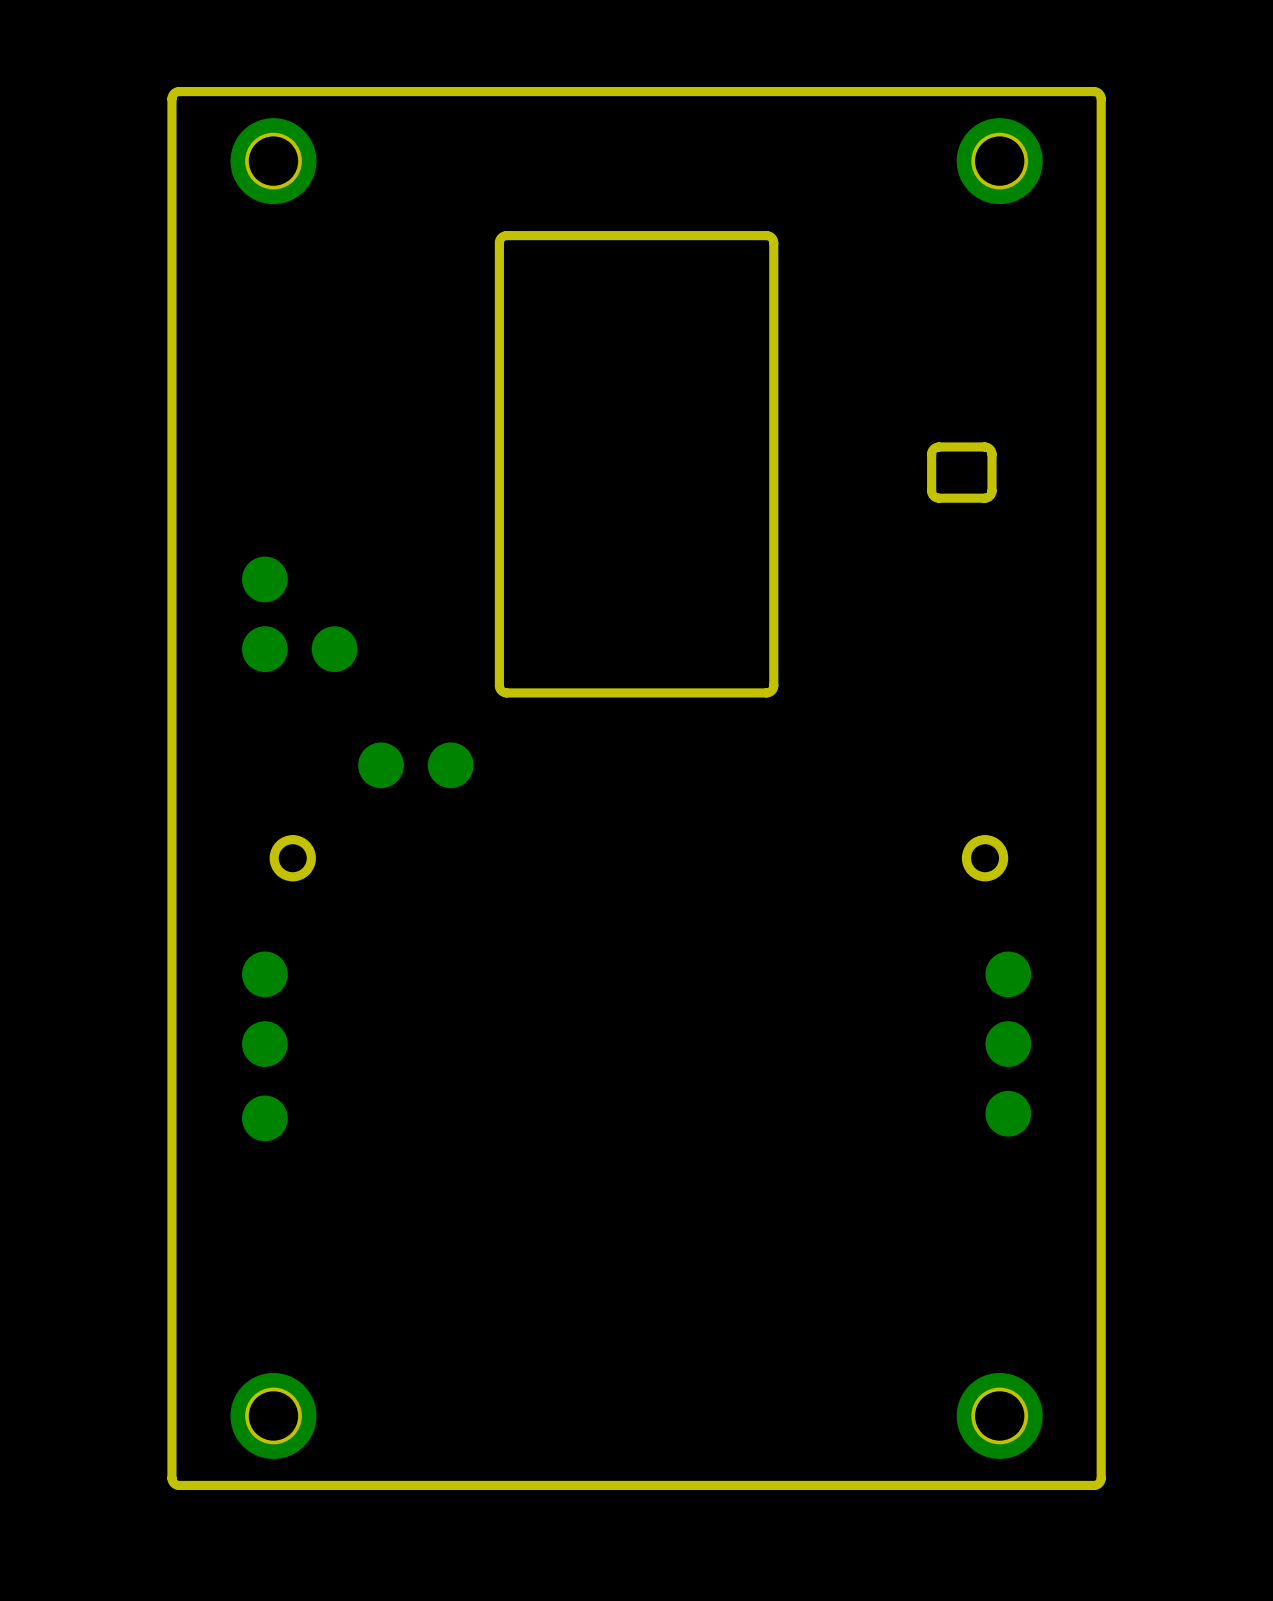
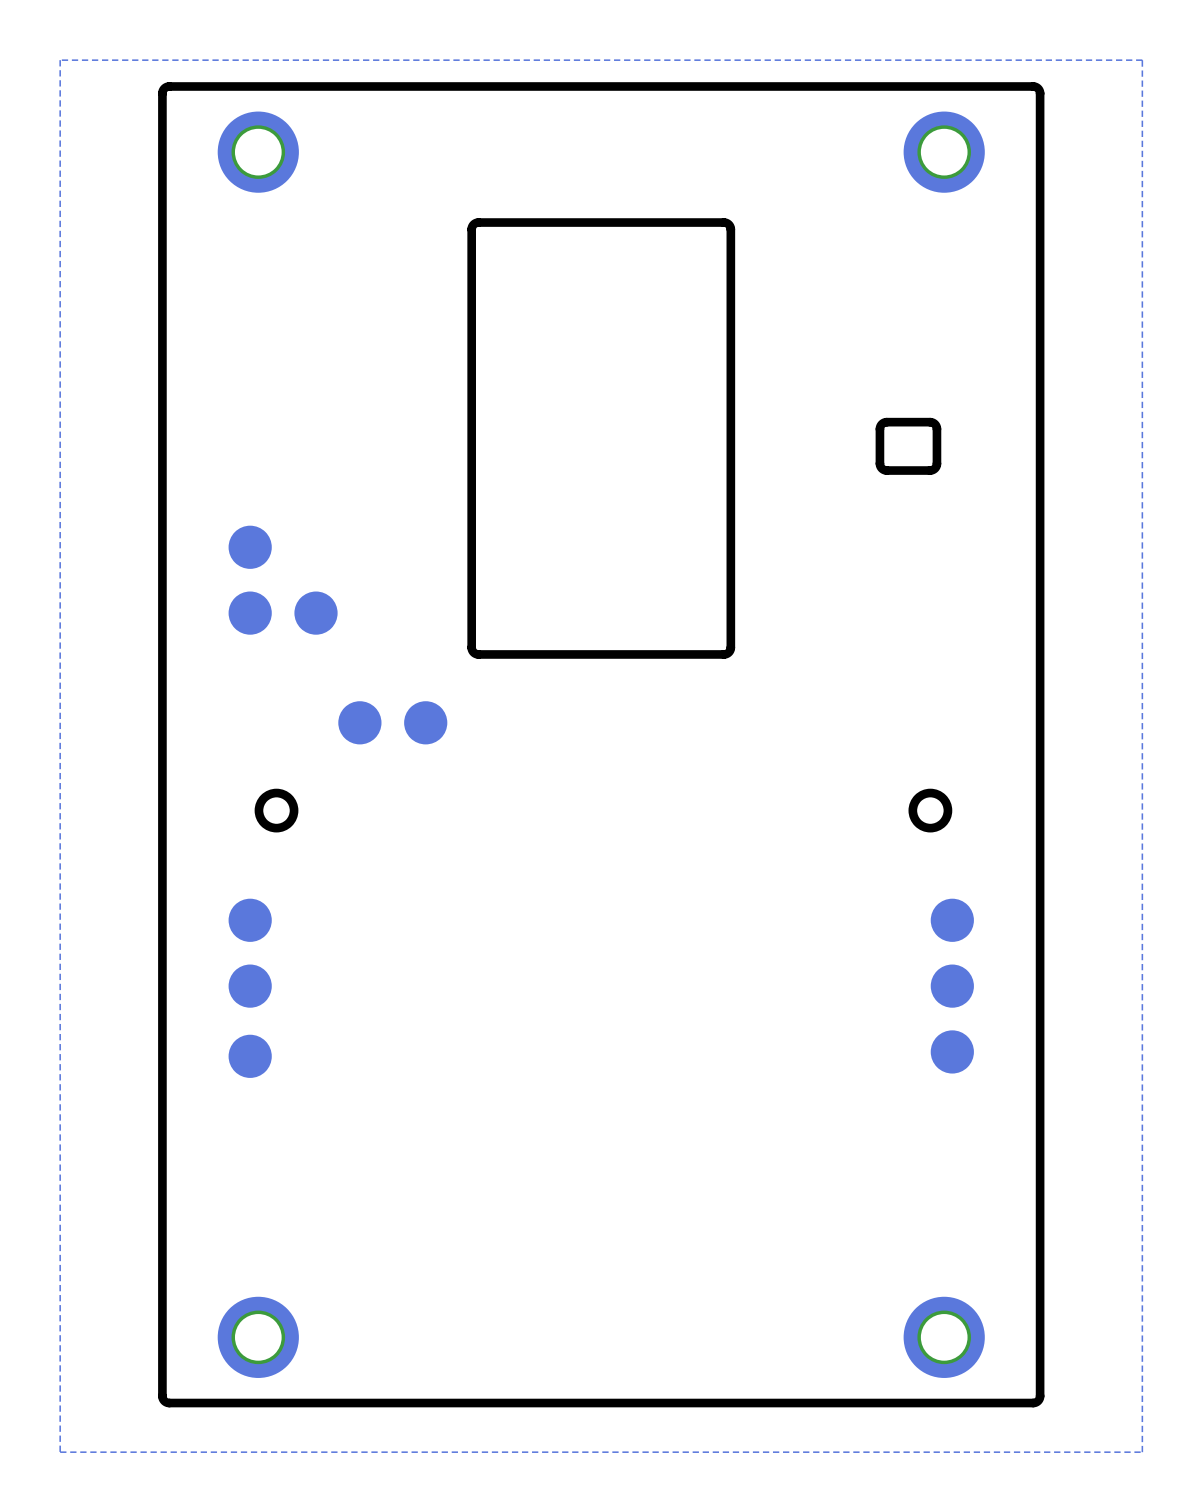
zone outline: none -> (1142, 60) (60, 60) (60, 1452) (1142, 1452) (1142, 60)

